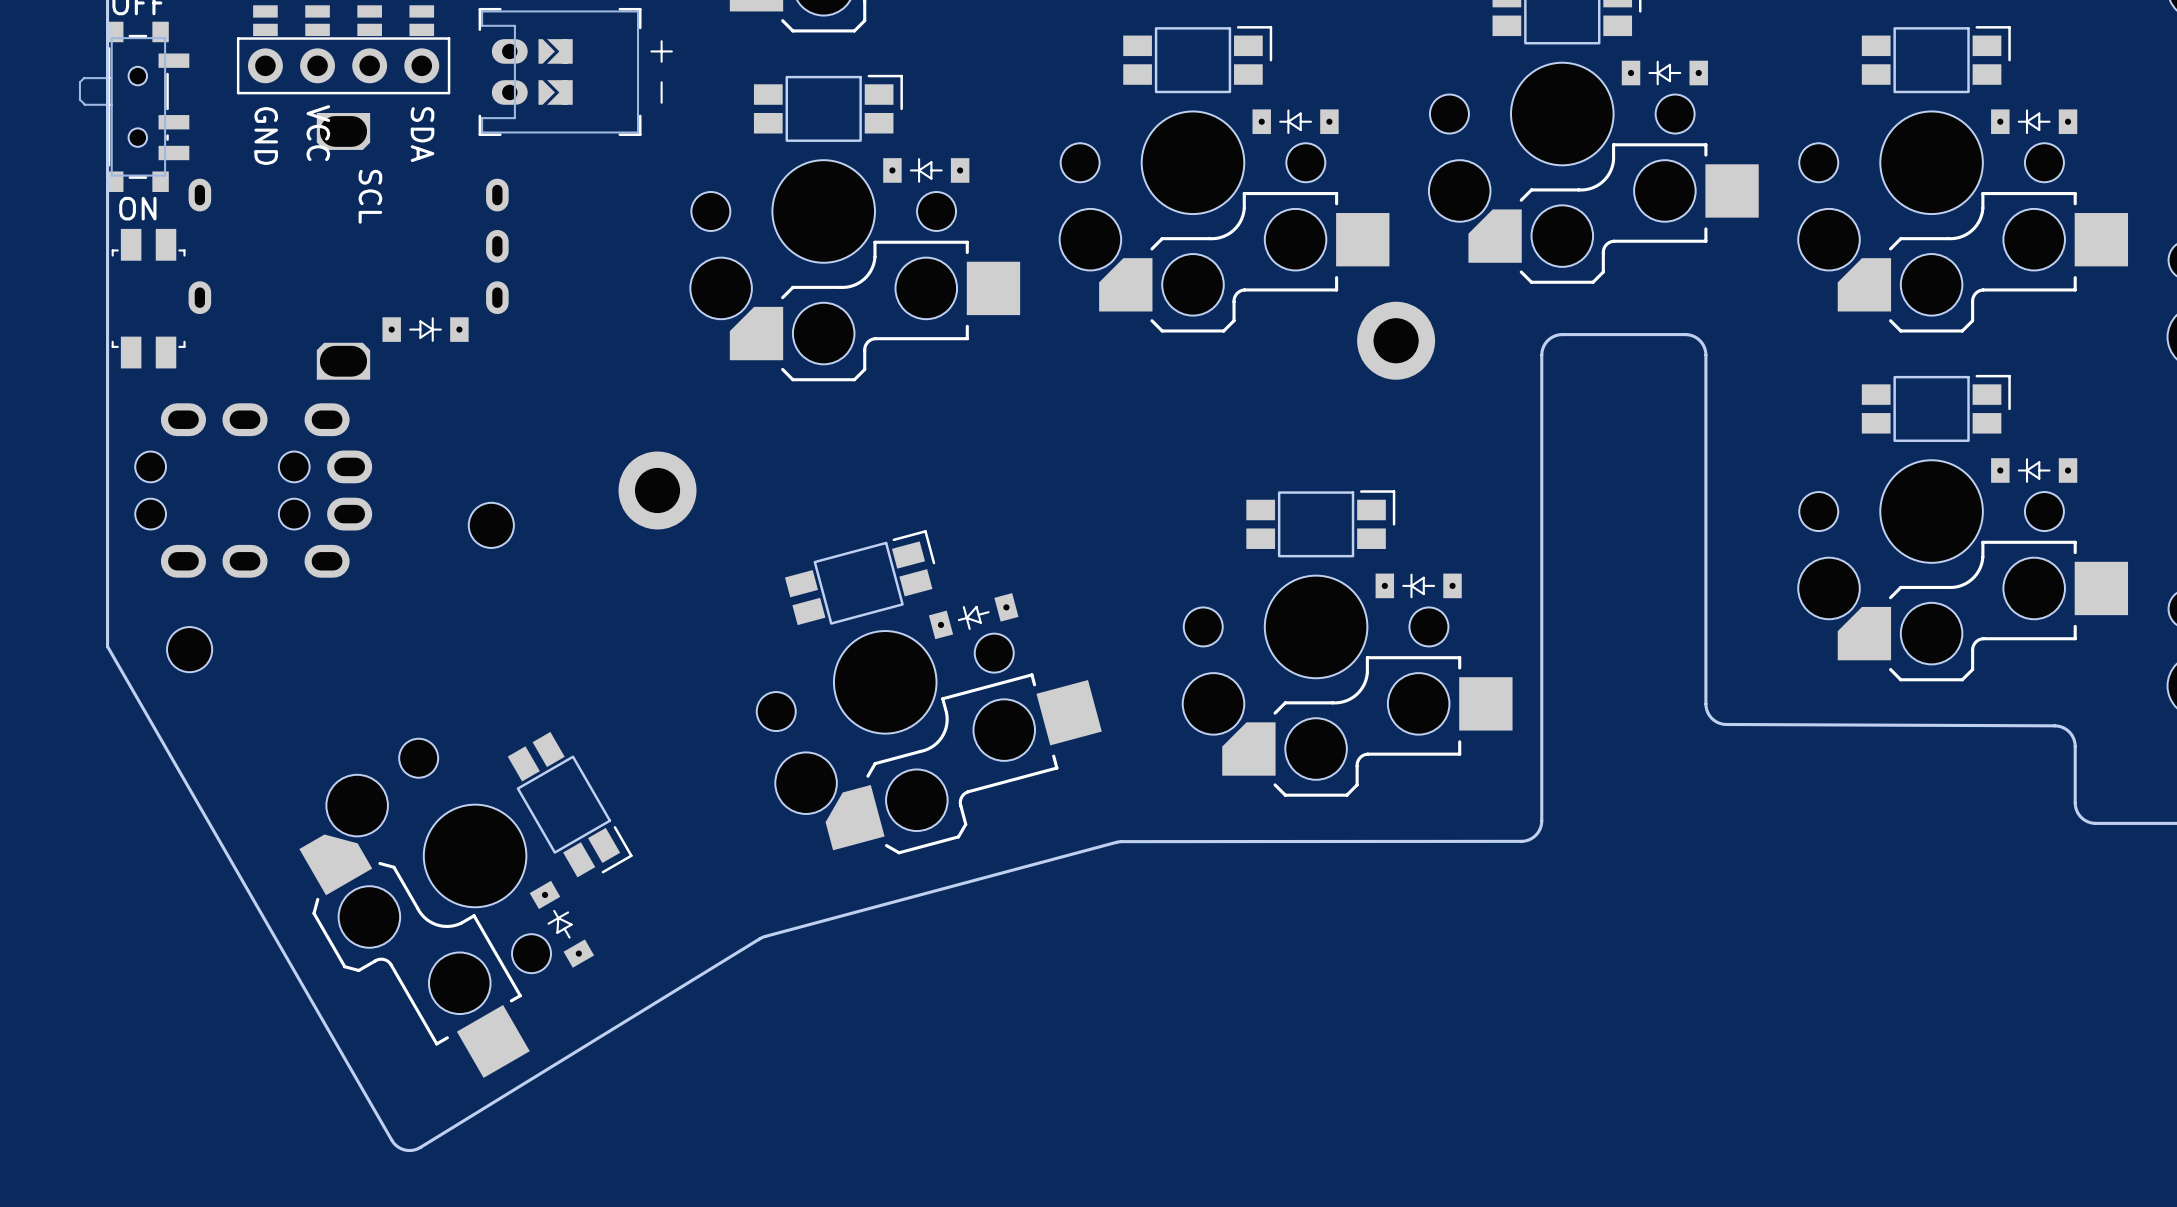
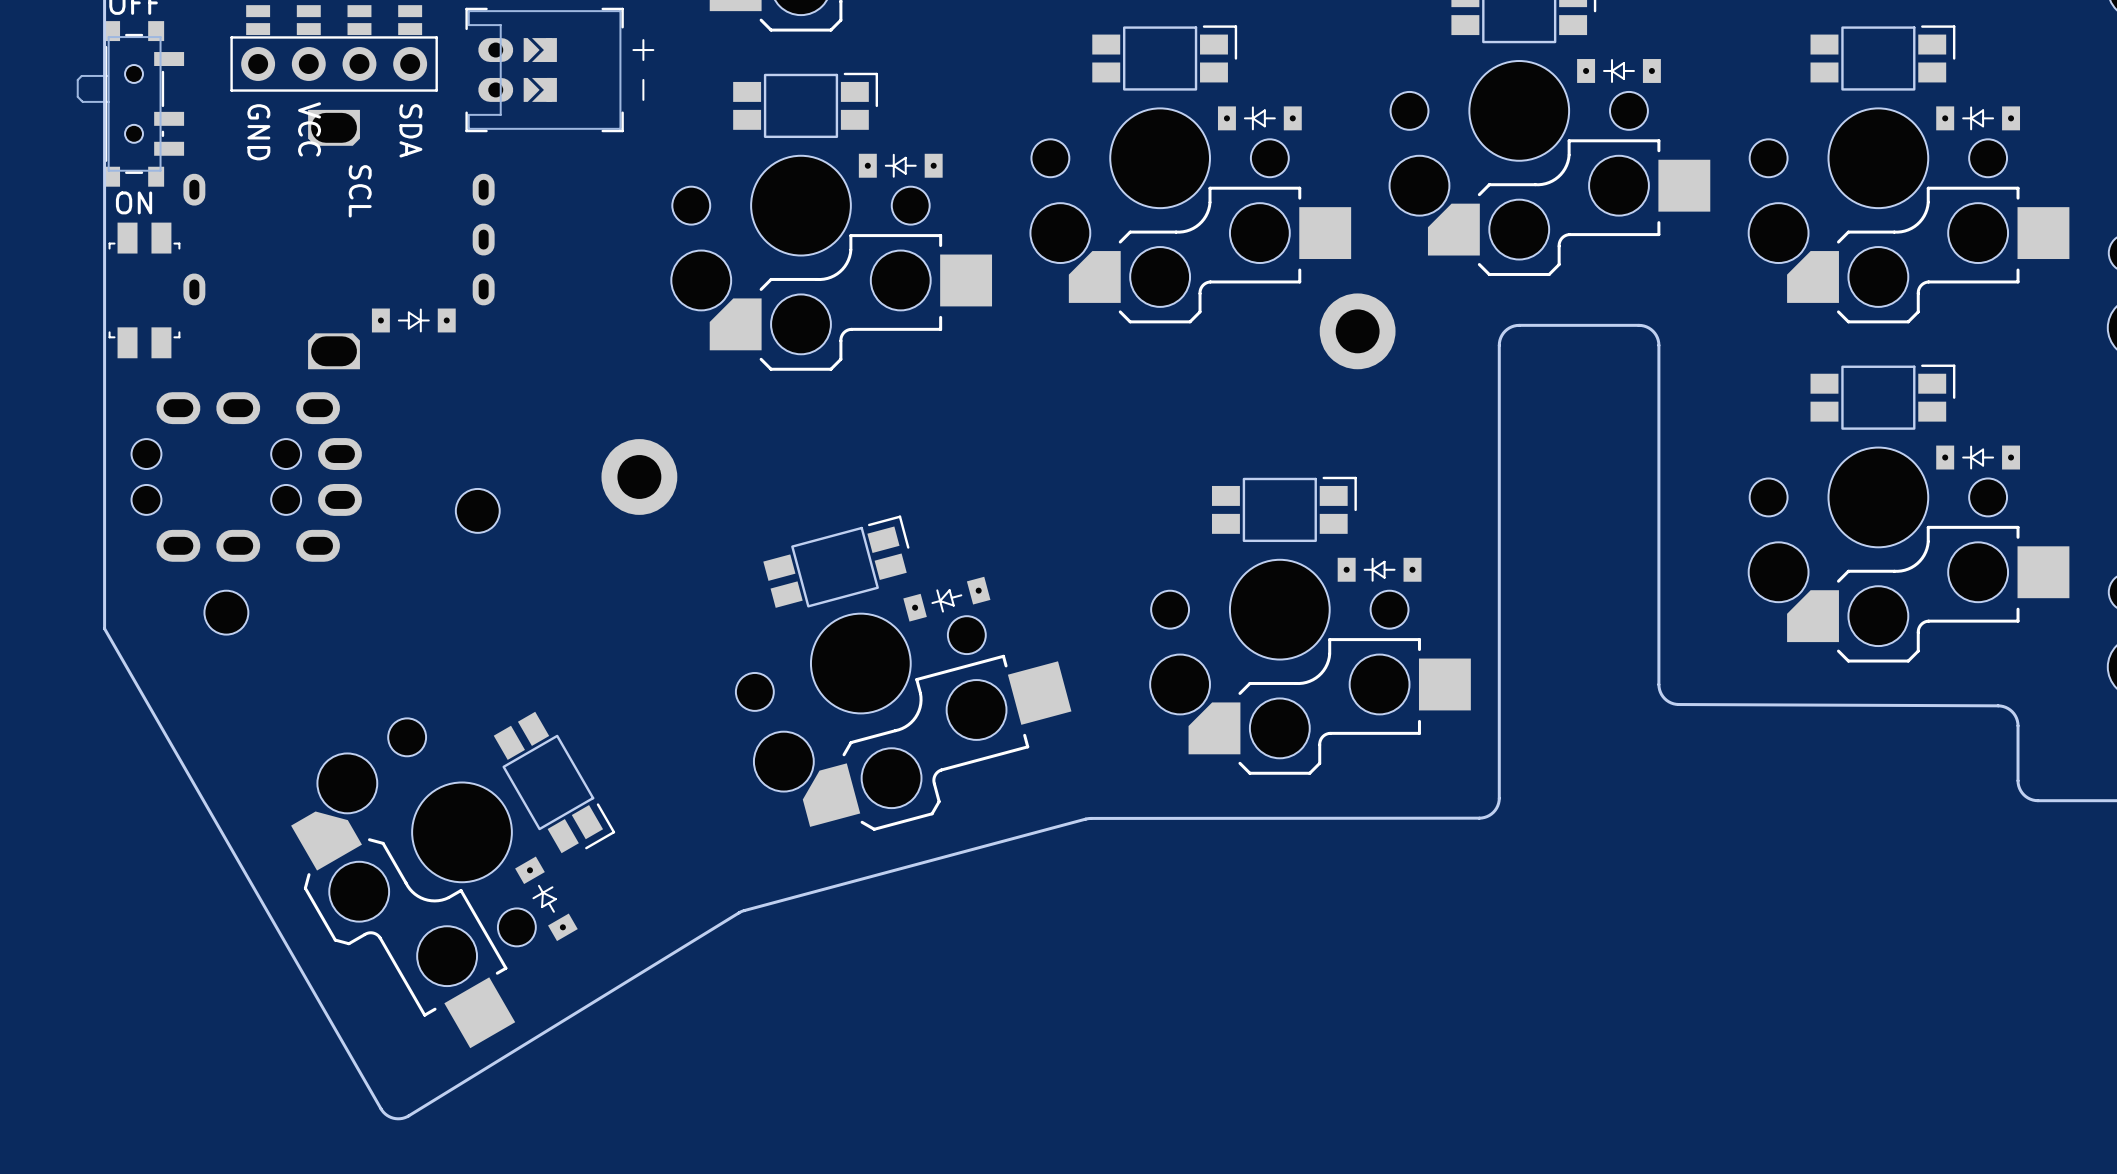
part position: (189, 649) -> (226, 612)

